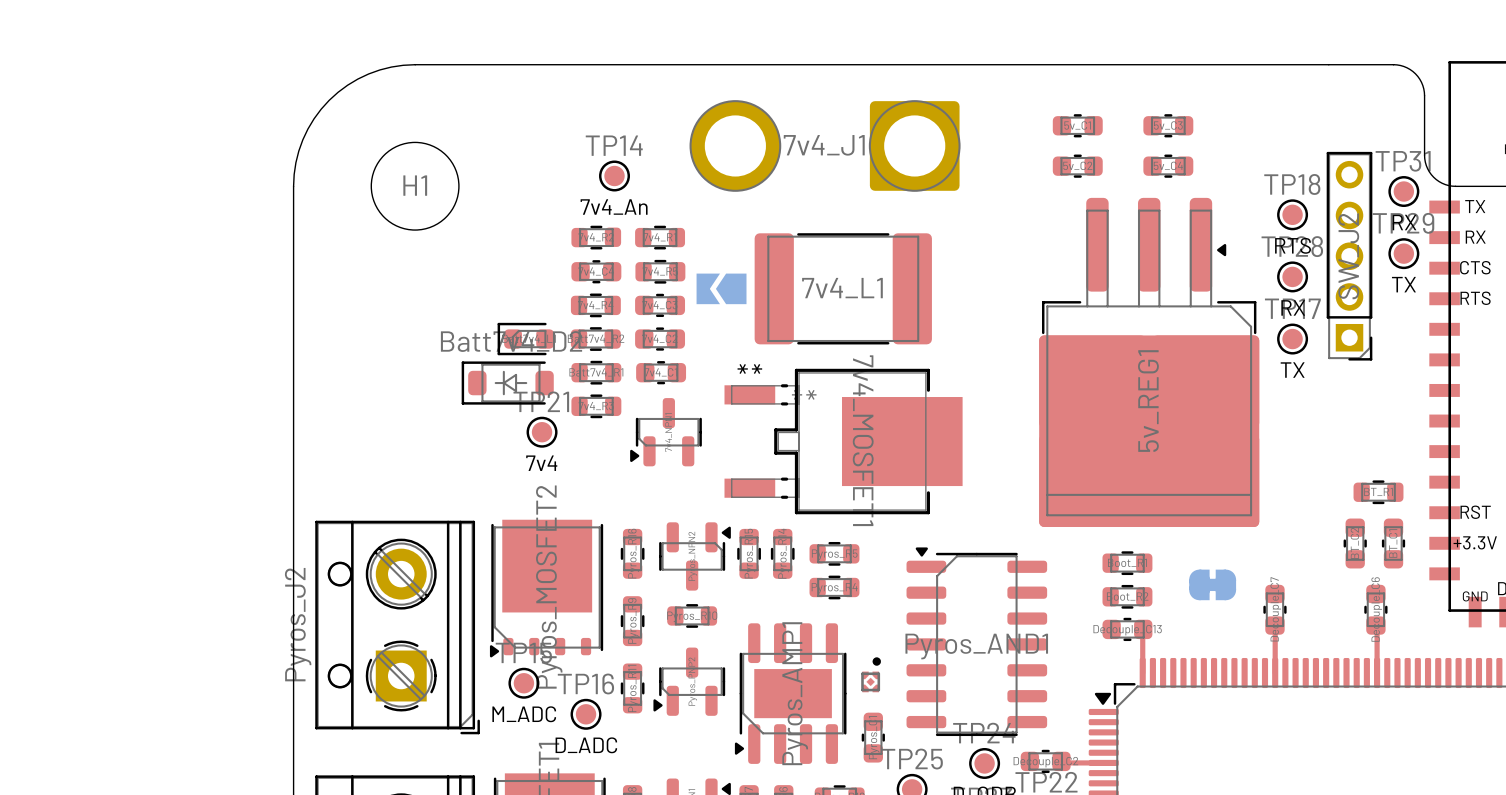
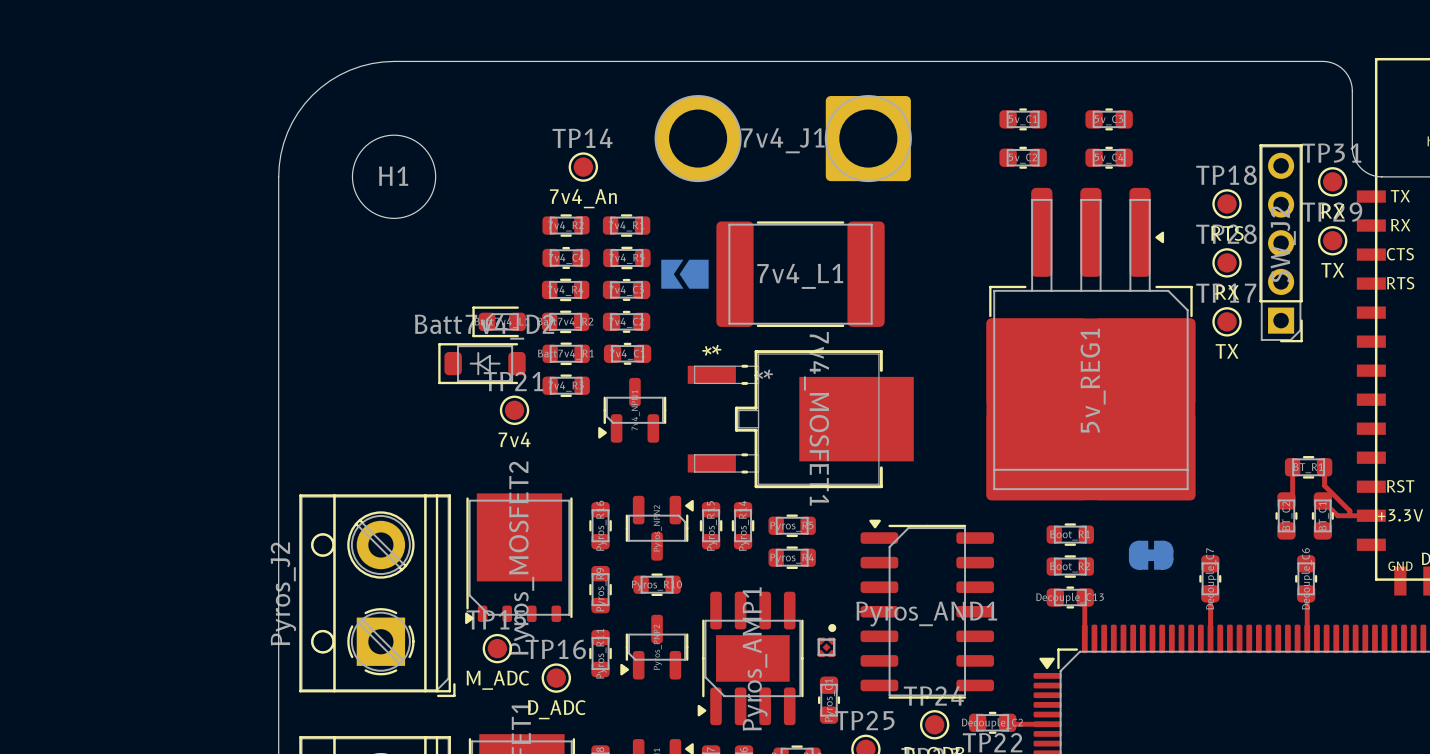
top track: none -> (1292, 467) (1292, 494) (1286, 500)
top track: none -> (1324, 467) (1324, 485) (1349, 511) (1349, 515)
top track: none -> (1322, 500) (1337, 515) (1371, 515)

